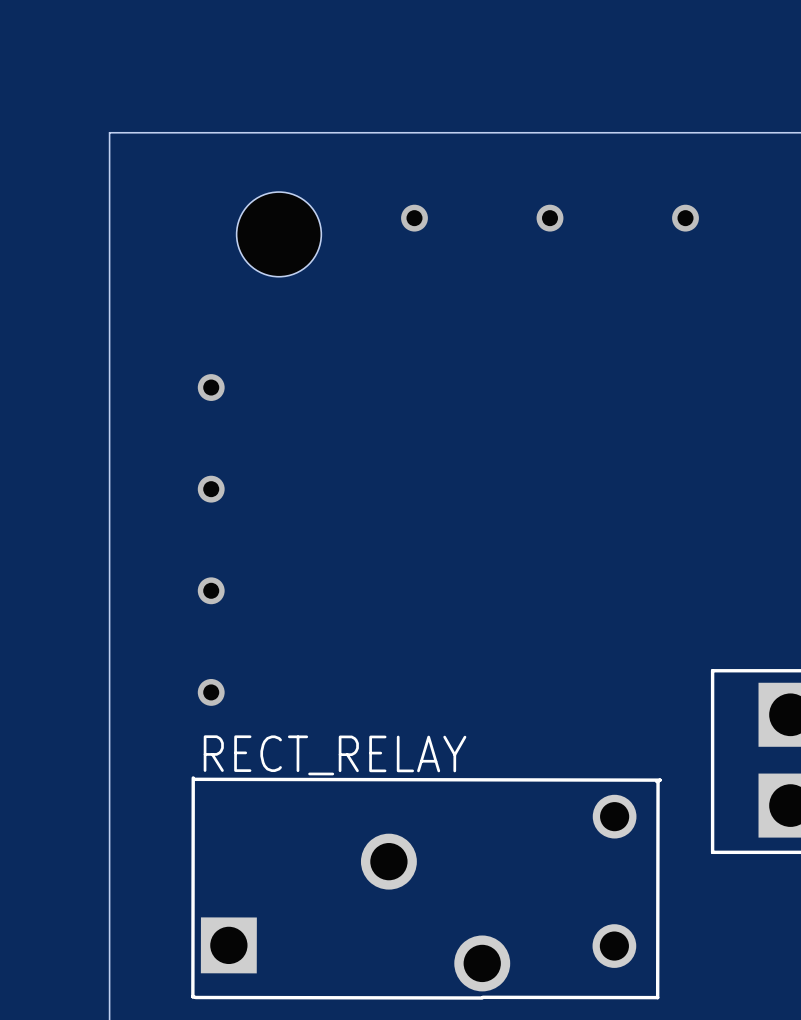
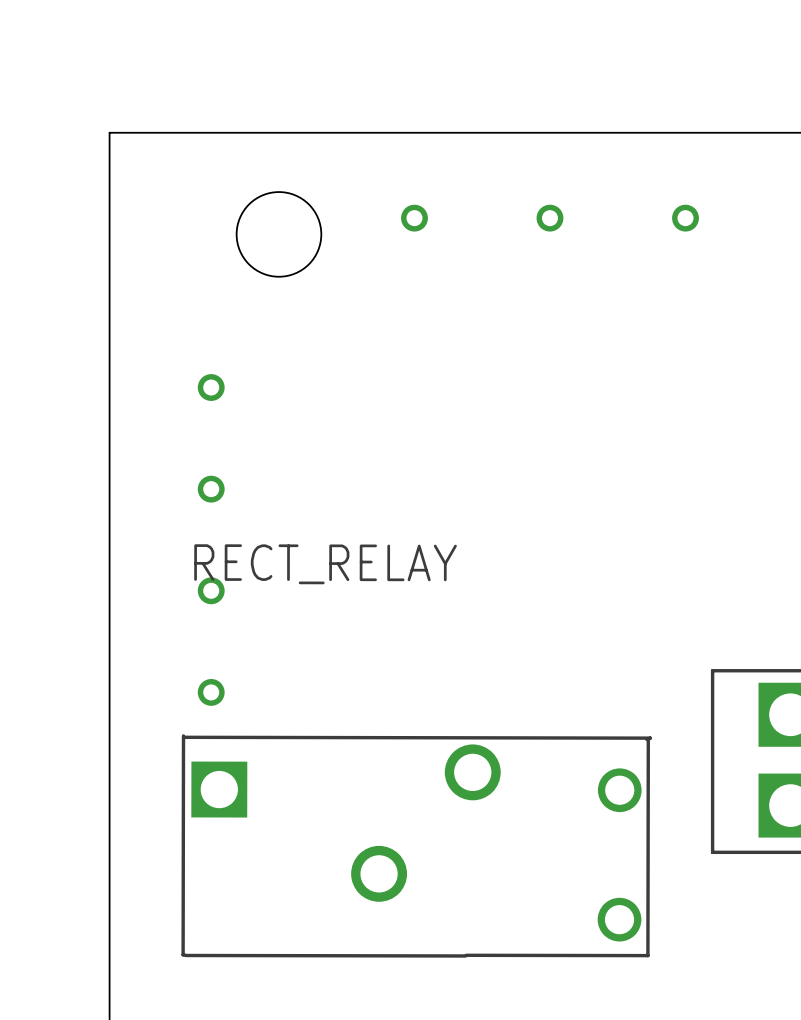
RECT_RELAY: none -> (416, 845)
RECT_RELAY: (426, 887) -> none

